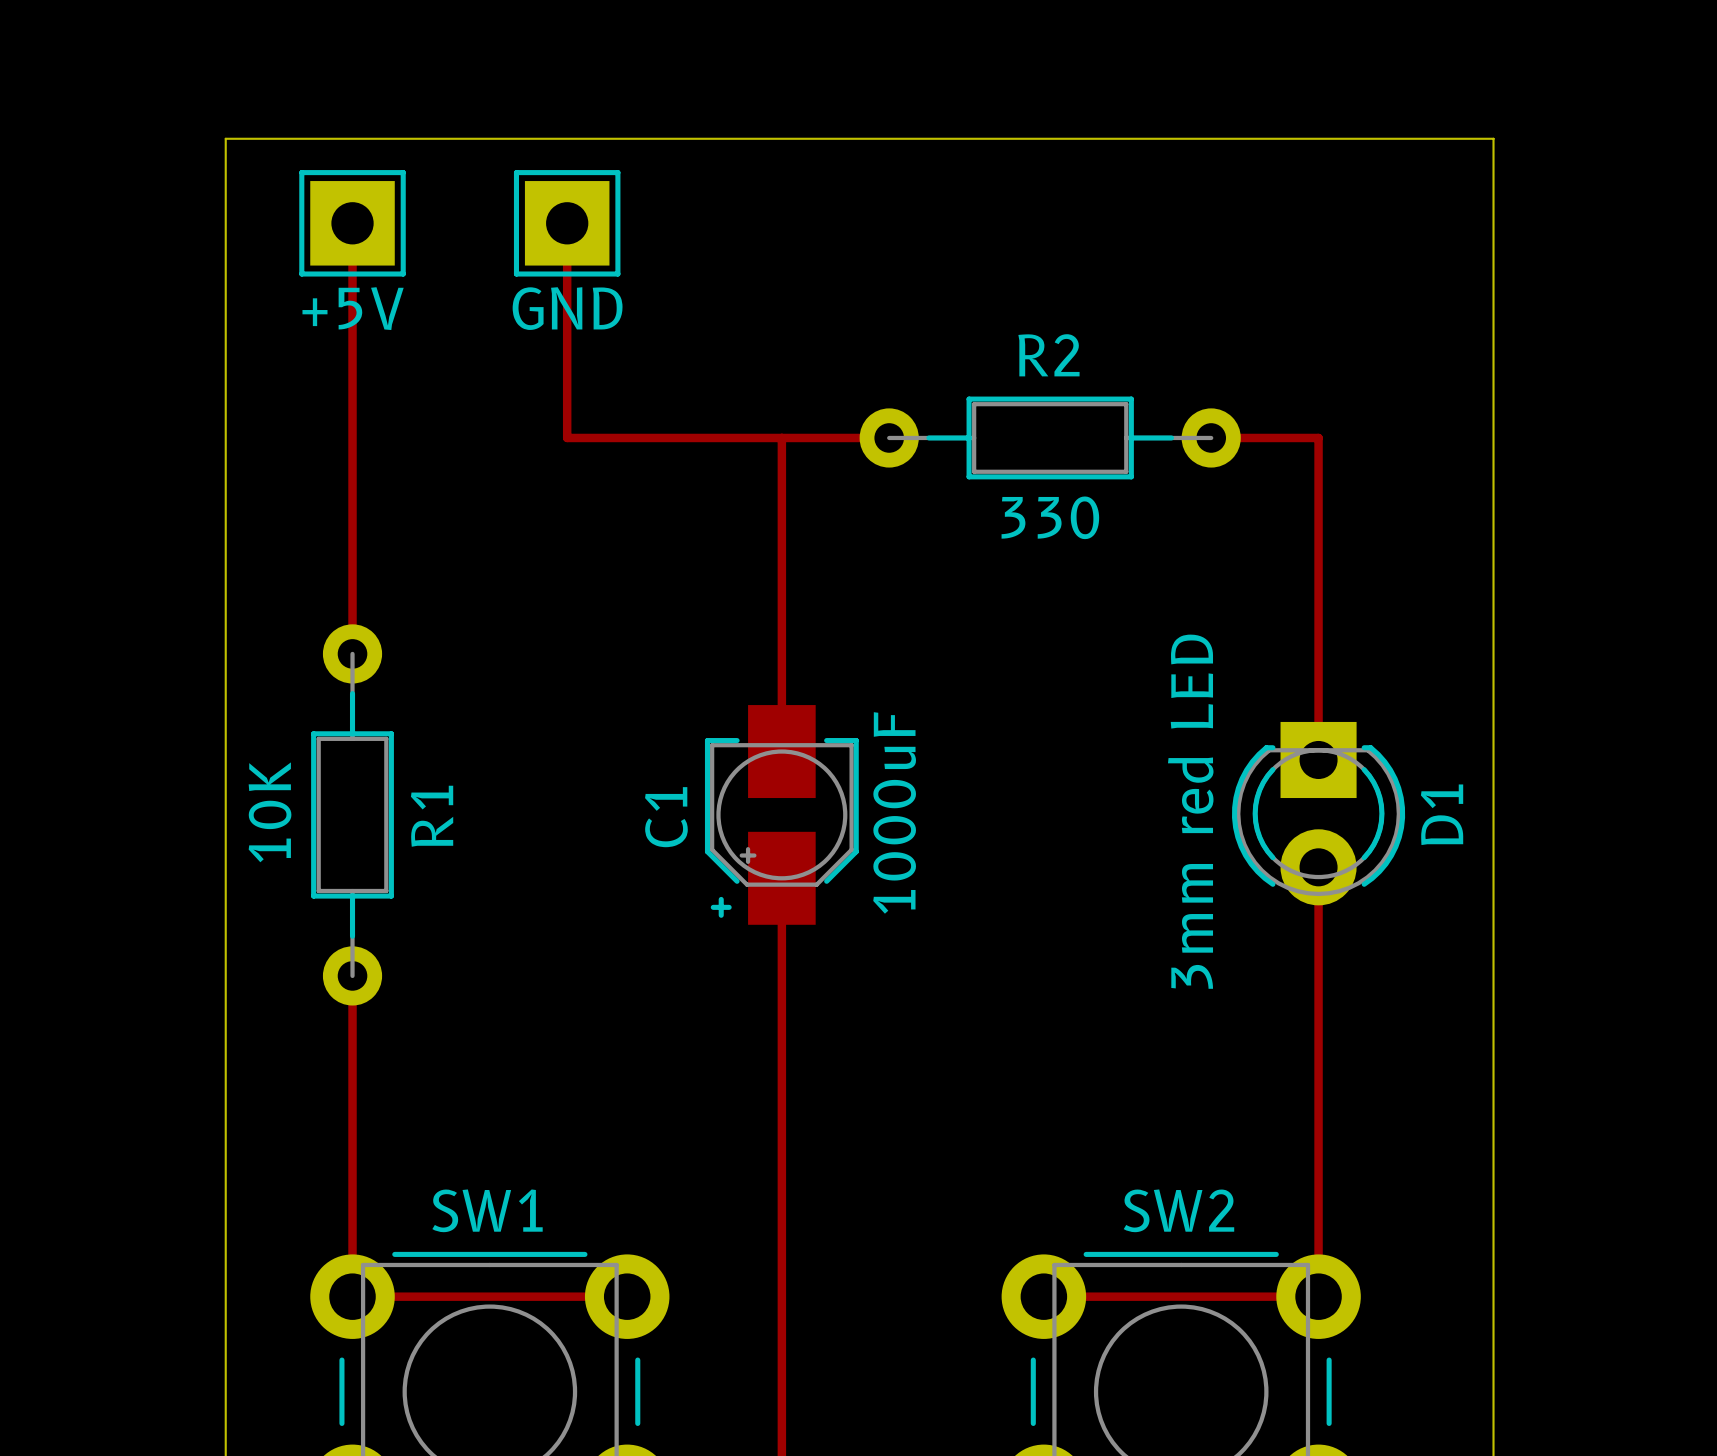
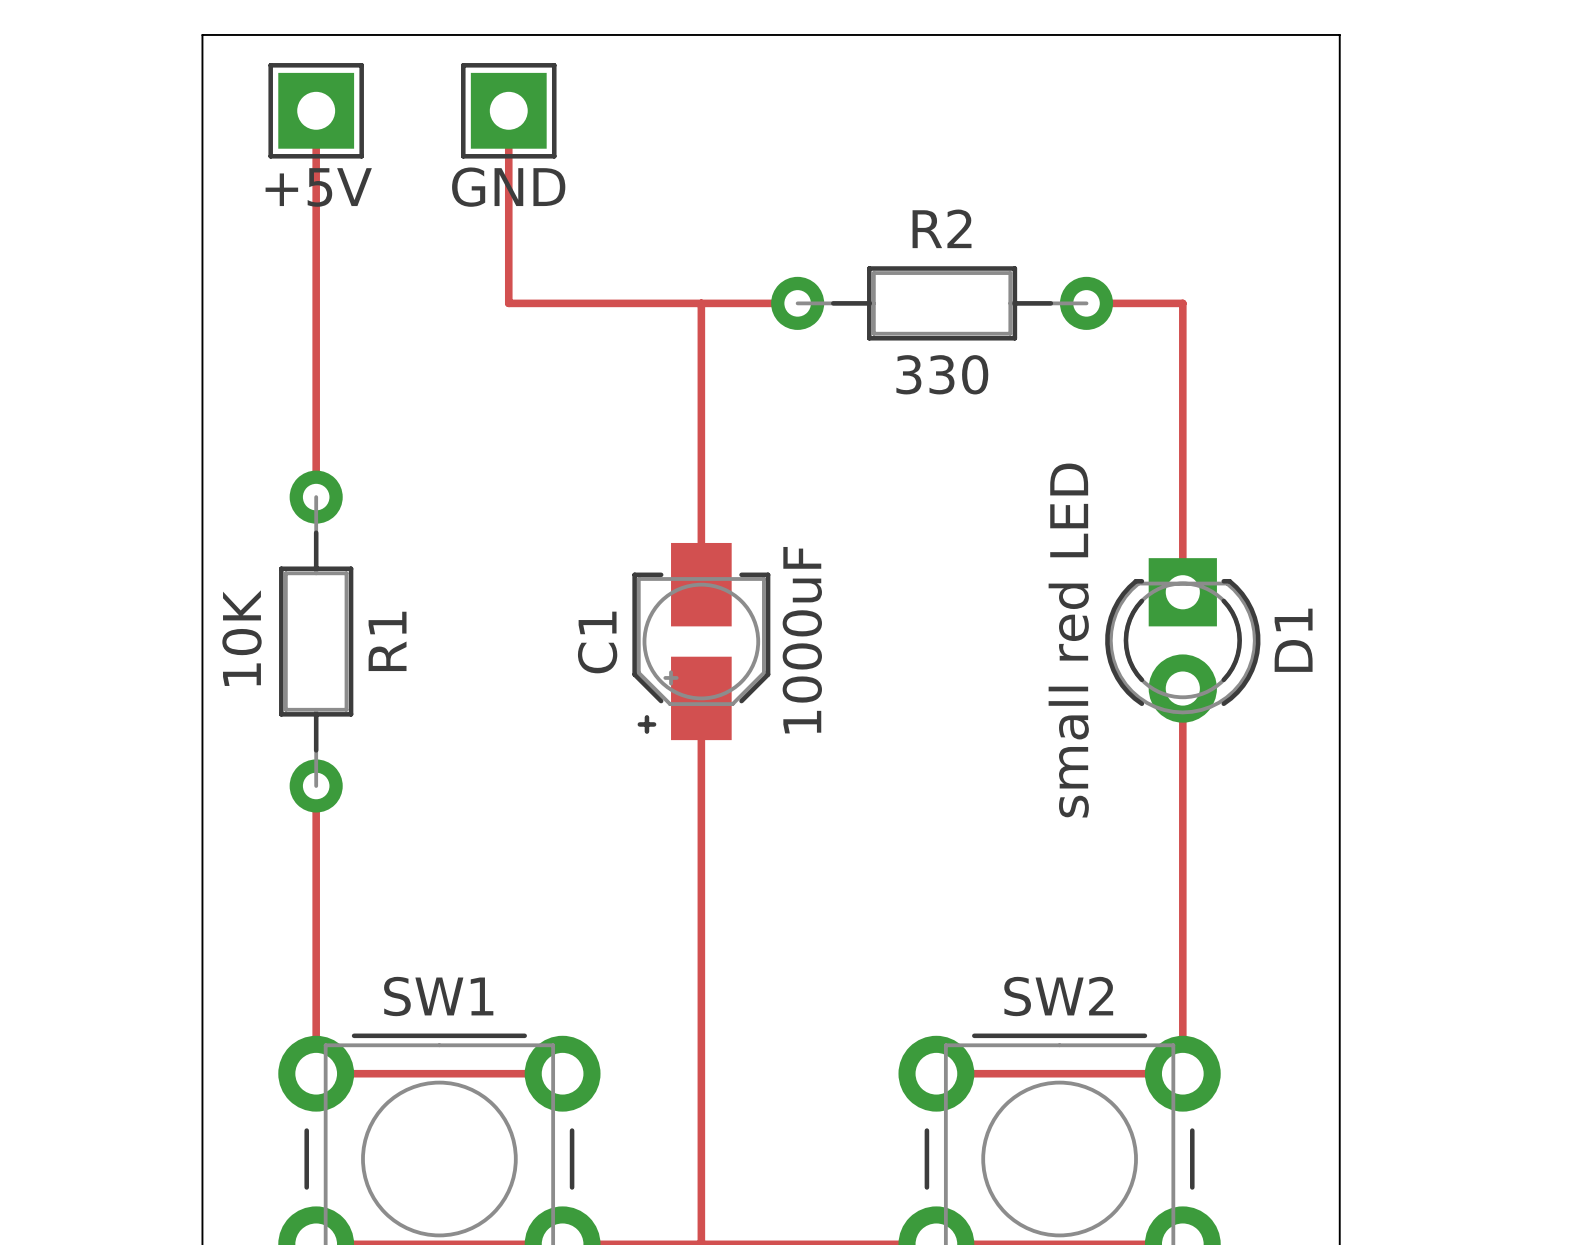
D1 value: 3mm red LED (1190, 811) -> small red LED (1068, 640)

